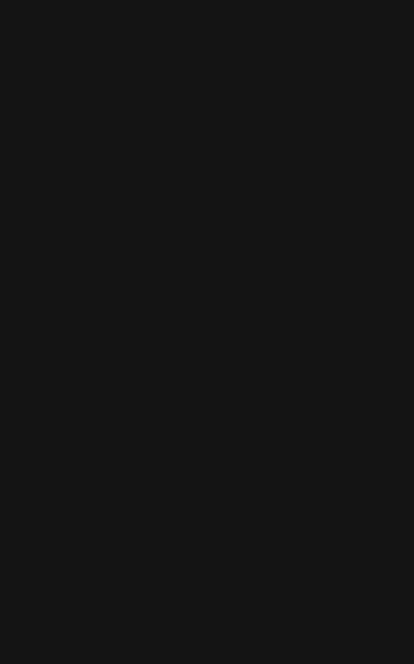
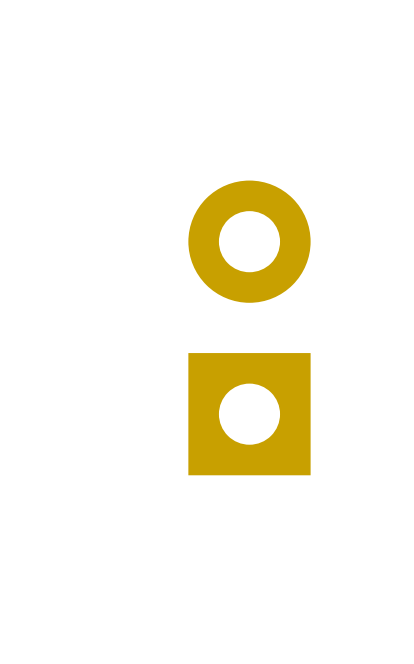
part: none -> (249, 327)

